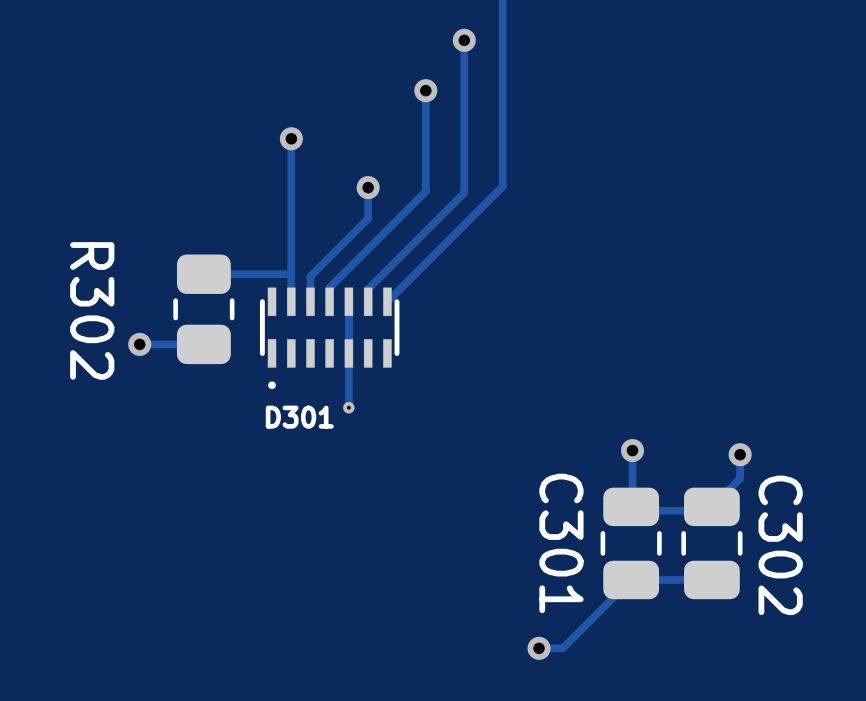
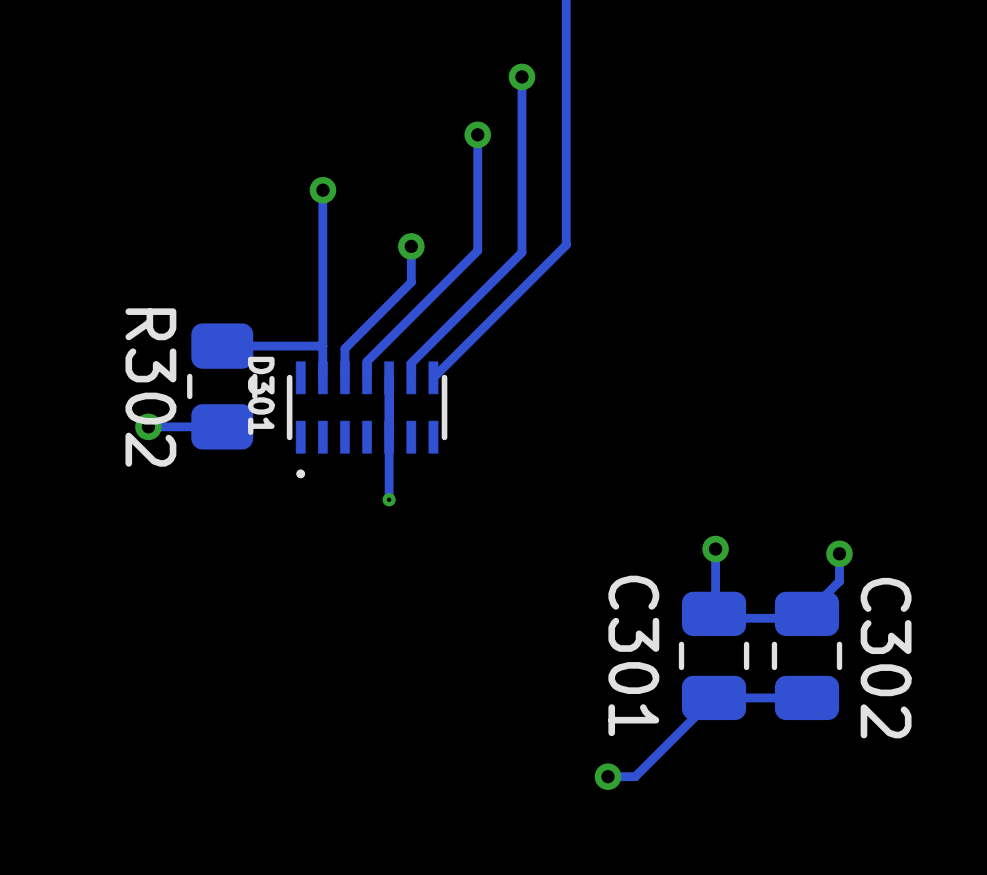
R302 name position: R302 (92, 310) -> R302 (150, 387)
D301 name rotation: 0° (299, 417) -> 90° clockwise (261, 395)
D301 name position: D301 (299, 417) -> D301 (261, 395)

